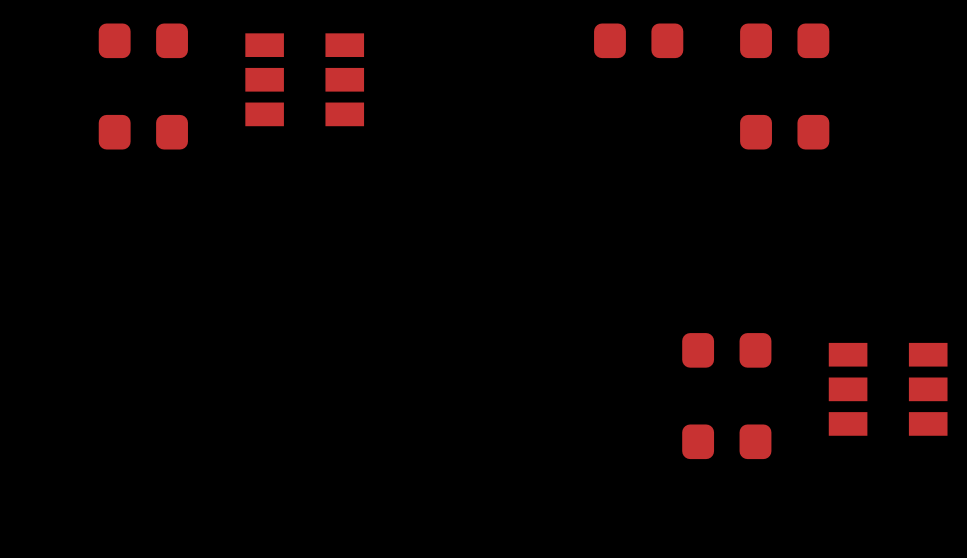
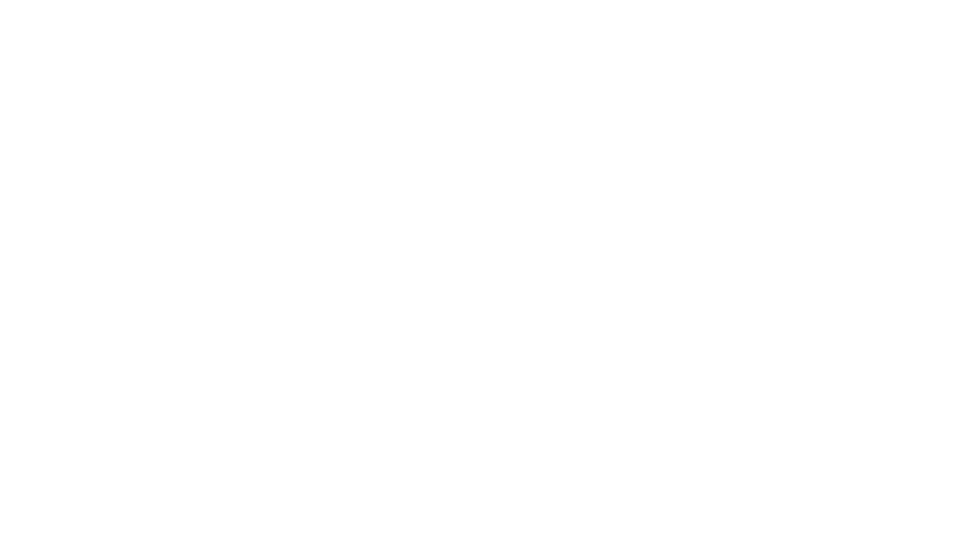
part: (143, 40) -> none
part: (638, 40) -> none
part: (784, 40) -> none
part: (304, 79) -> none
part: (143, 132) -> none
part: (784, 132) -> none
part: (726, 350) -> none
part: (888, 389) -> none
part: (726, 441) -> none

